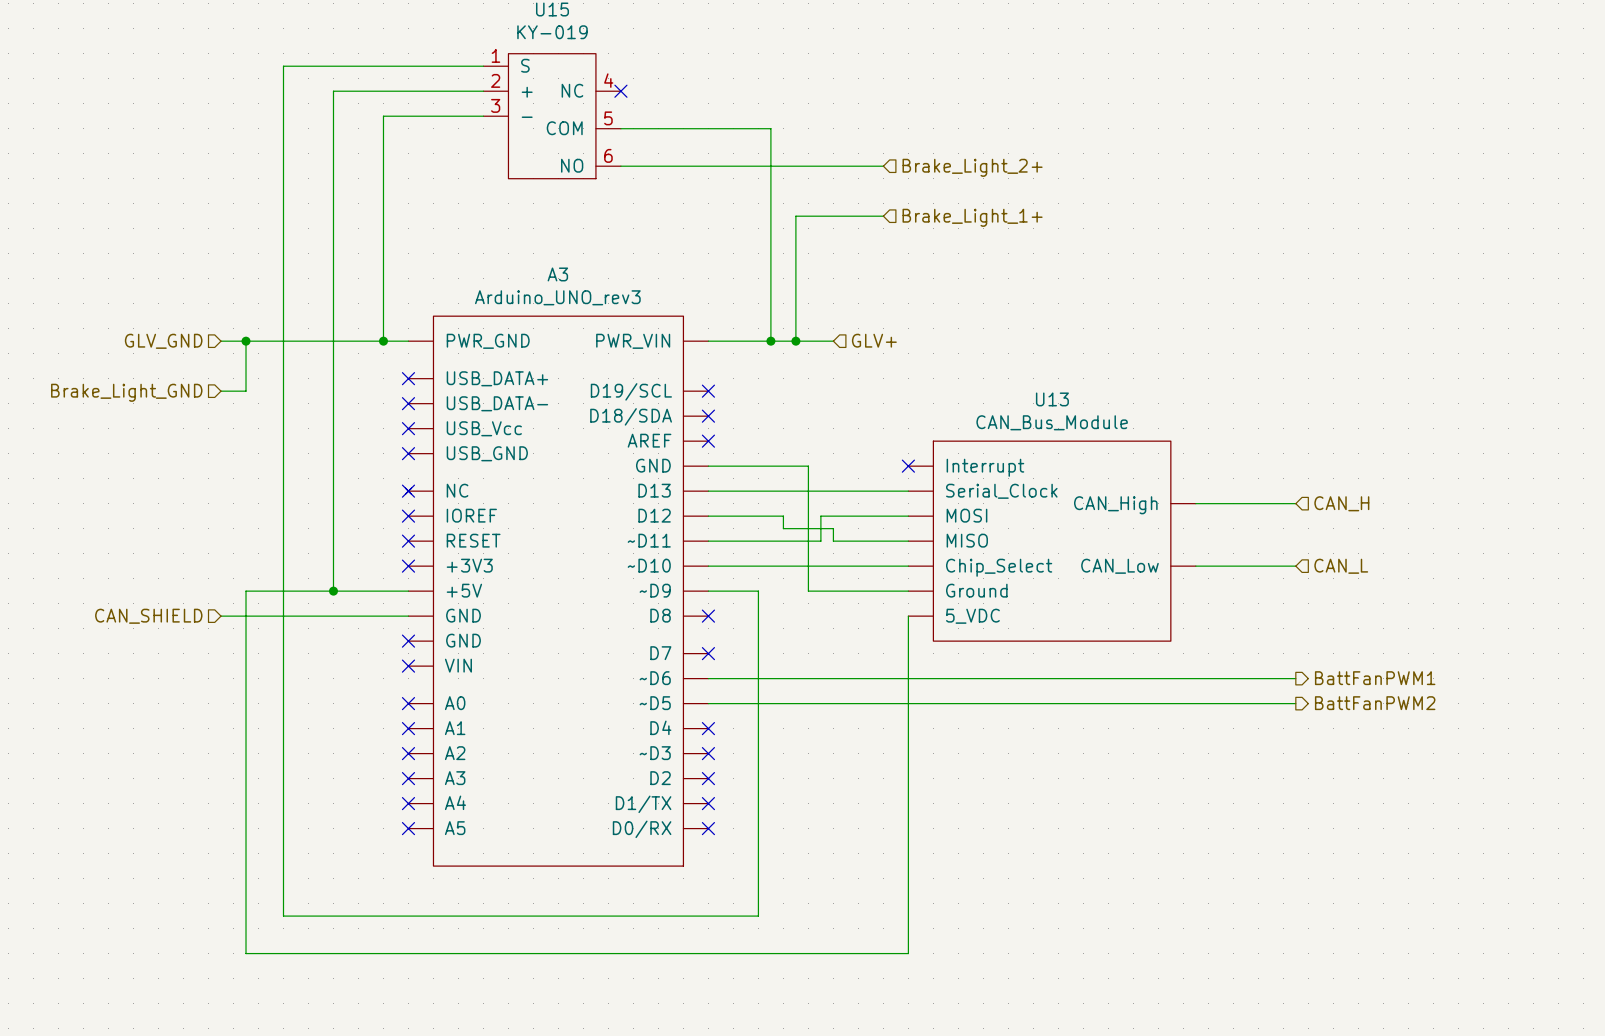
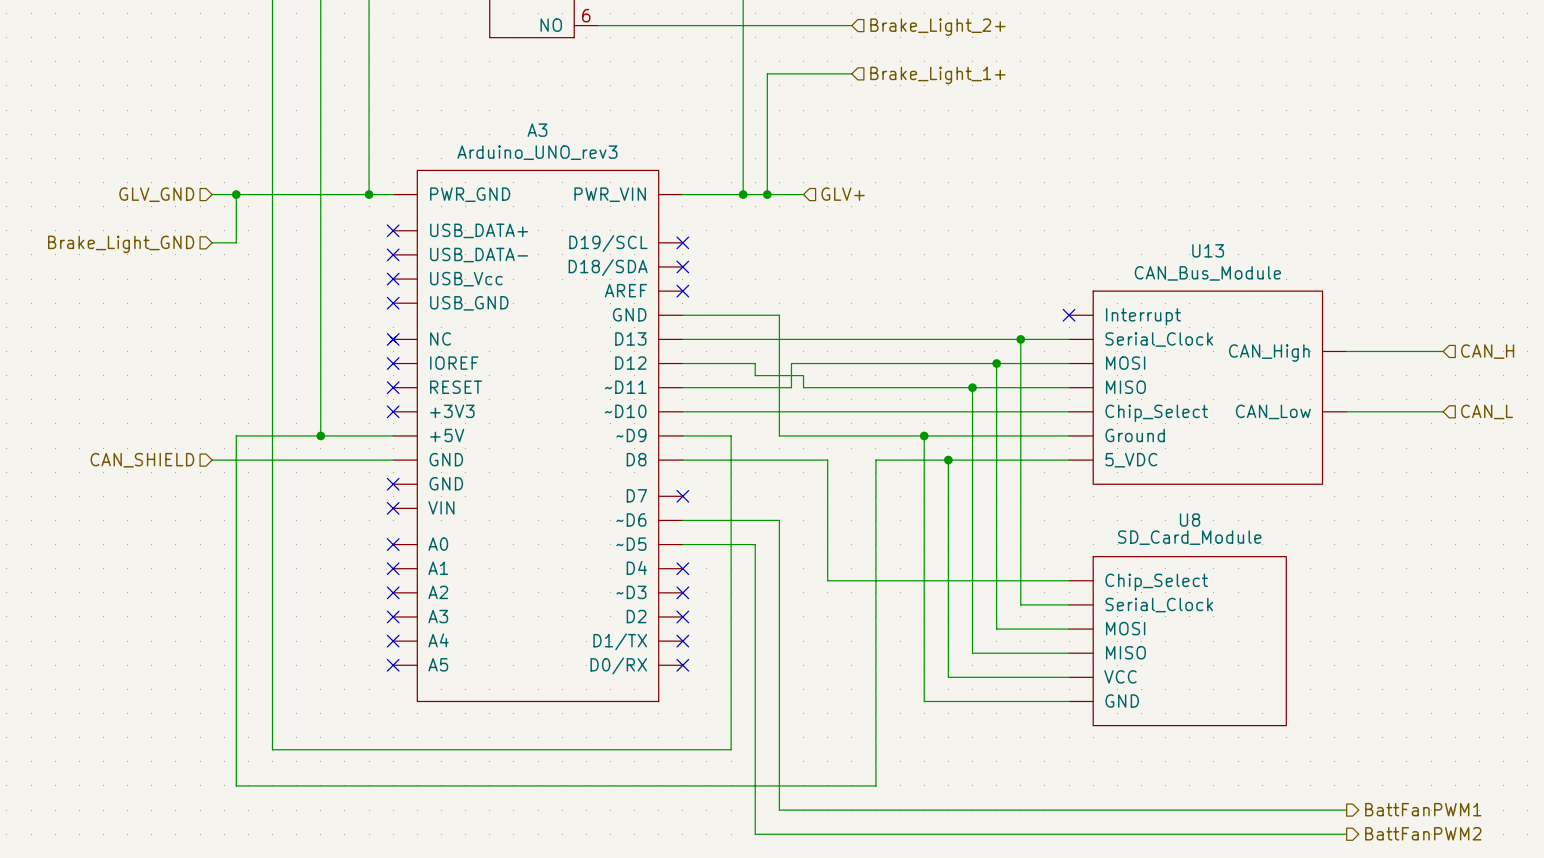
no-connect mark: (908, 466) -> none
no-connect mark: none -> (1069, 315)
wire: none -> (875, 339) (1069, 339)
wire: none -> (1020, 339) (1020, 604) (1069, 604)
junction: none -> (1020, 339)
wire: (1195, 503) (1295, 503) -> (1346, 351) (1443, 351)
hierarchical label position: CAN_H (1341, 503) -> CAN_H (1487, 351)
wire: none -> (875, 363) (1069, 363)
wire: none -> (996, 363) (996, 629) (1069, 629)
junction: none -> (996, 363)
wire: none -> (875, 387) (1069, 387)
wire: none -> (972, 387) (972, 653) (1069, 653)
junction: none -> (972, 387)
U13 position: (1052, 541) -> (1207, 387)
wire: none -> (875, 411) (1069, 411)
wire: (1195, 566) (1295, 566) -> (1346, 411) (1443, 411)
hierarchical label position: CAN_L (1341, 566) -> CAN_L (1487, 411)
wire: none -> (875, 435) (1069, 435)
wire: none -> (924, 435) (924, 701) (1069, 701)
junction: none -> (924, 435)
wire: none -> (682, 460) (827, 460) (827, 580) (1069, 580)
no-connect mark: (708, 616) -> none
wire: none -> (875, 460) (1069, 460)
wire: none -> (948, 460) (948, 677) (1069, 677)
junction: none -> (948, 460)
wire: (808, 678) (1295, 678) -> (779, 520) (779, 810) (1346, 810)
hierarchical label: BattFanPWM1 (1375, 678) -> none
wire: (783, 703) (1295, 703) -> (755, 544) (755, 834) (1346, 834)
hierarchical label: BattFanPWM2 (1375, 703) -> none
U8: none -> SD_Card_Module (1177, 641)
hierarchical label: none -> BattFanPWM1 (1423, 809)
hierarchical label: none -> BattFanPWM2 (1423, 833)

